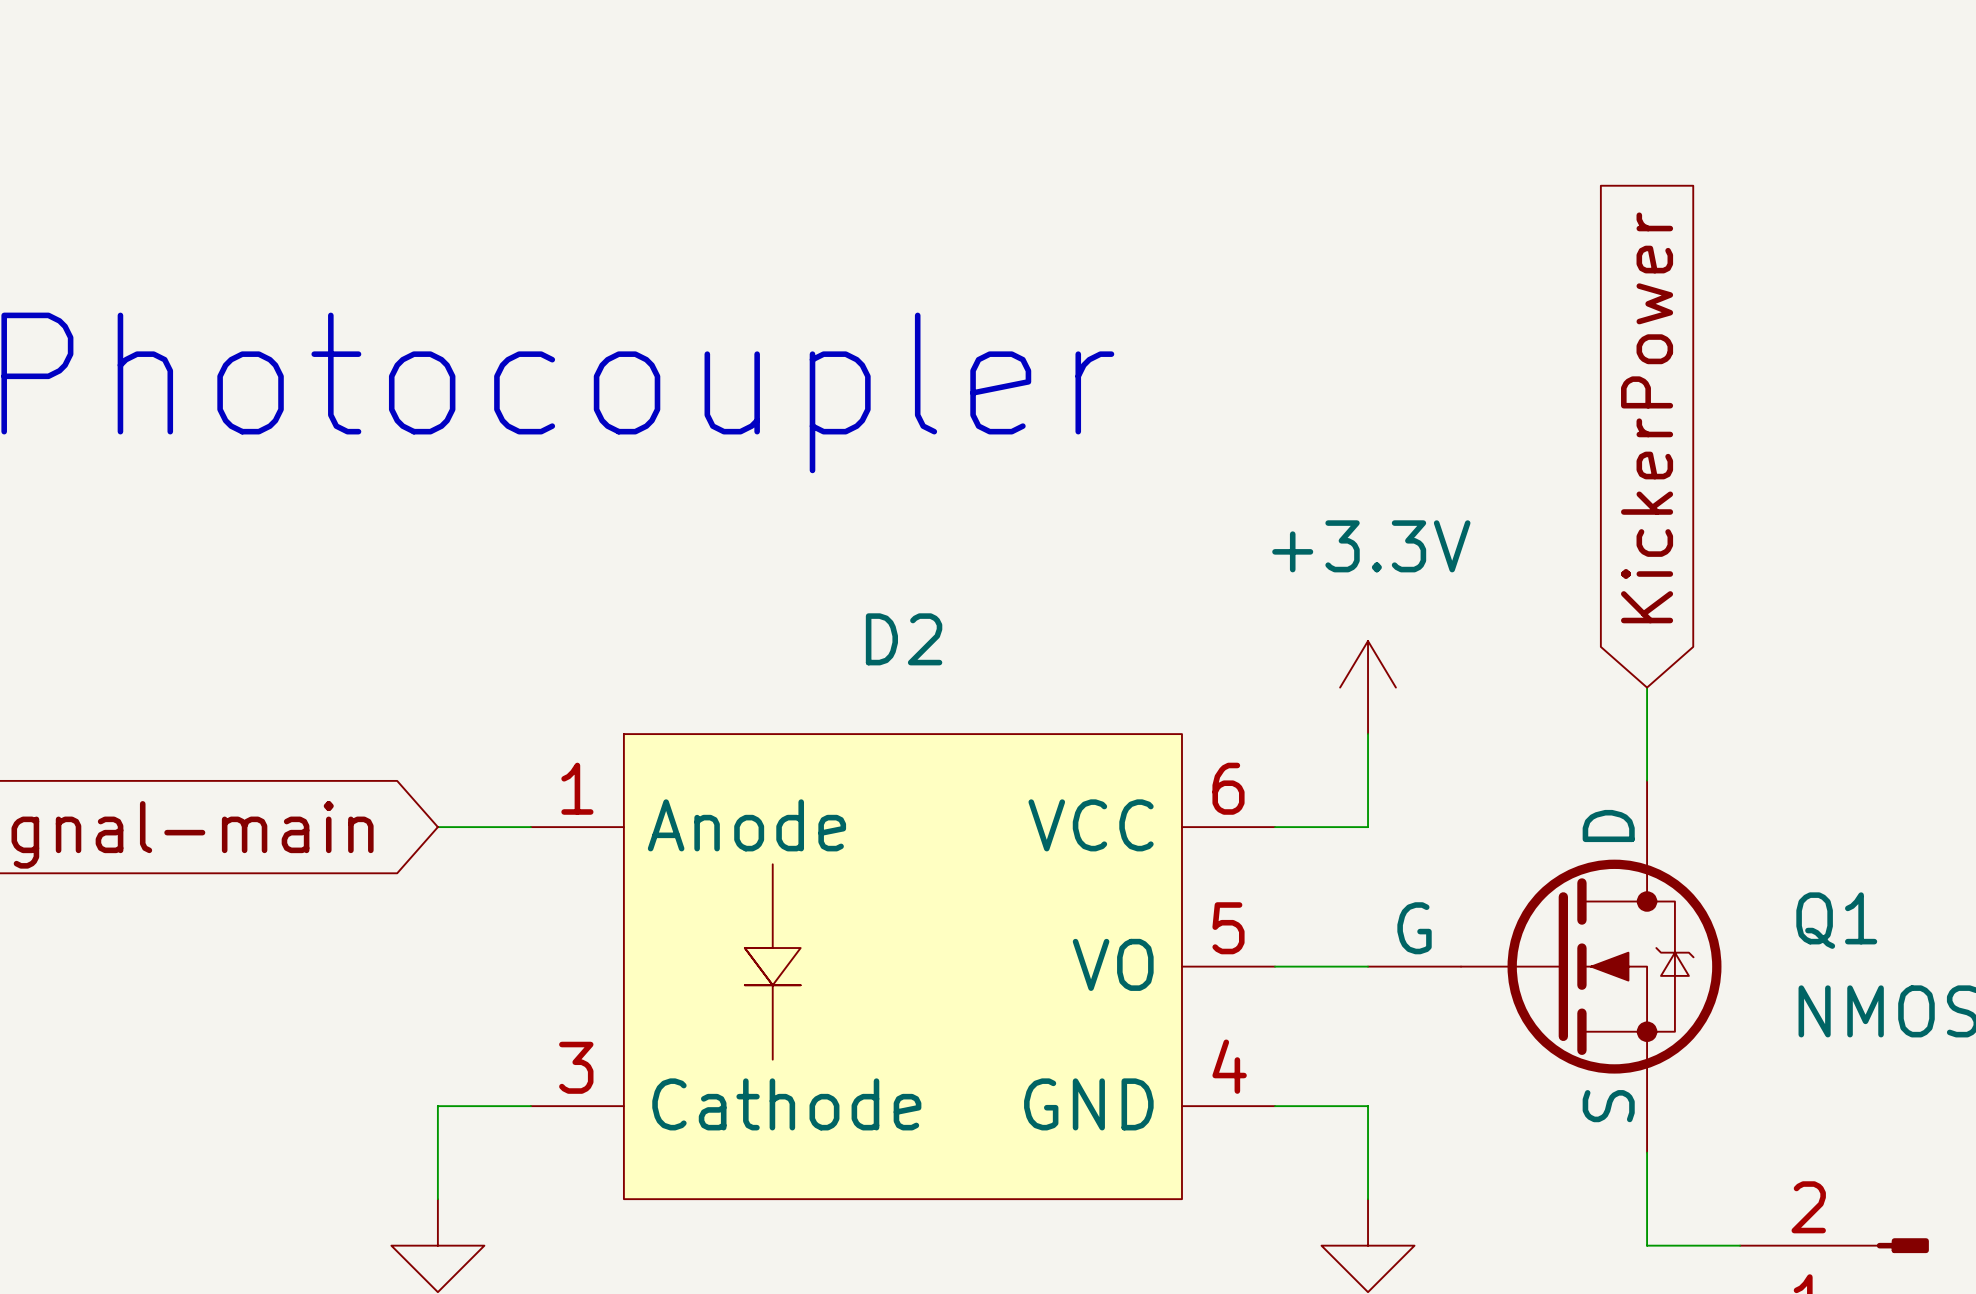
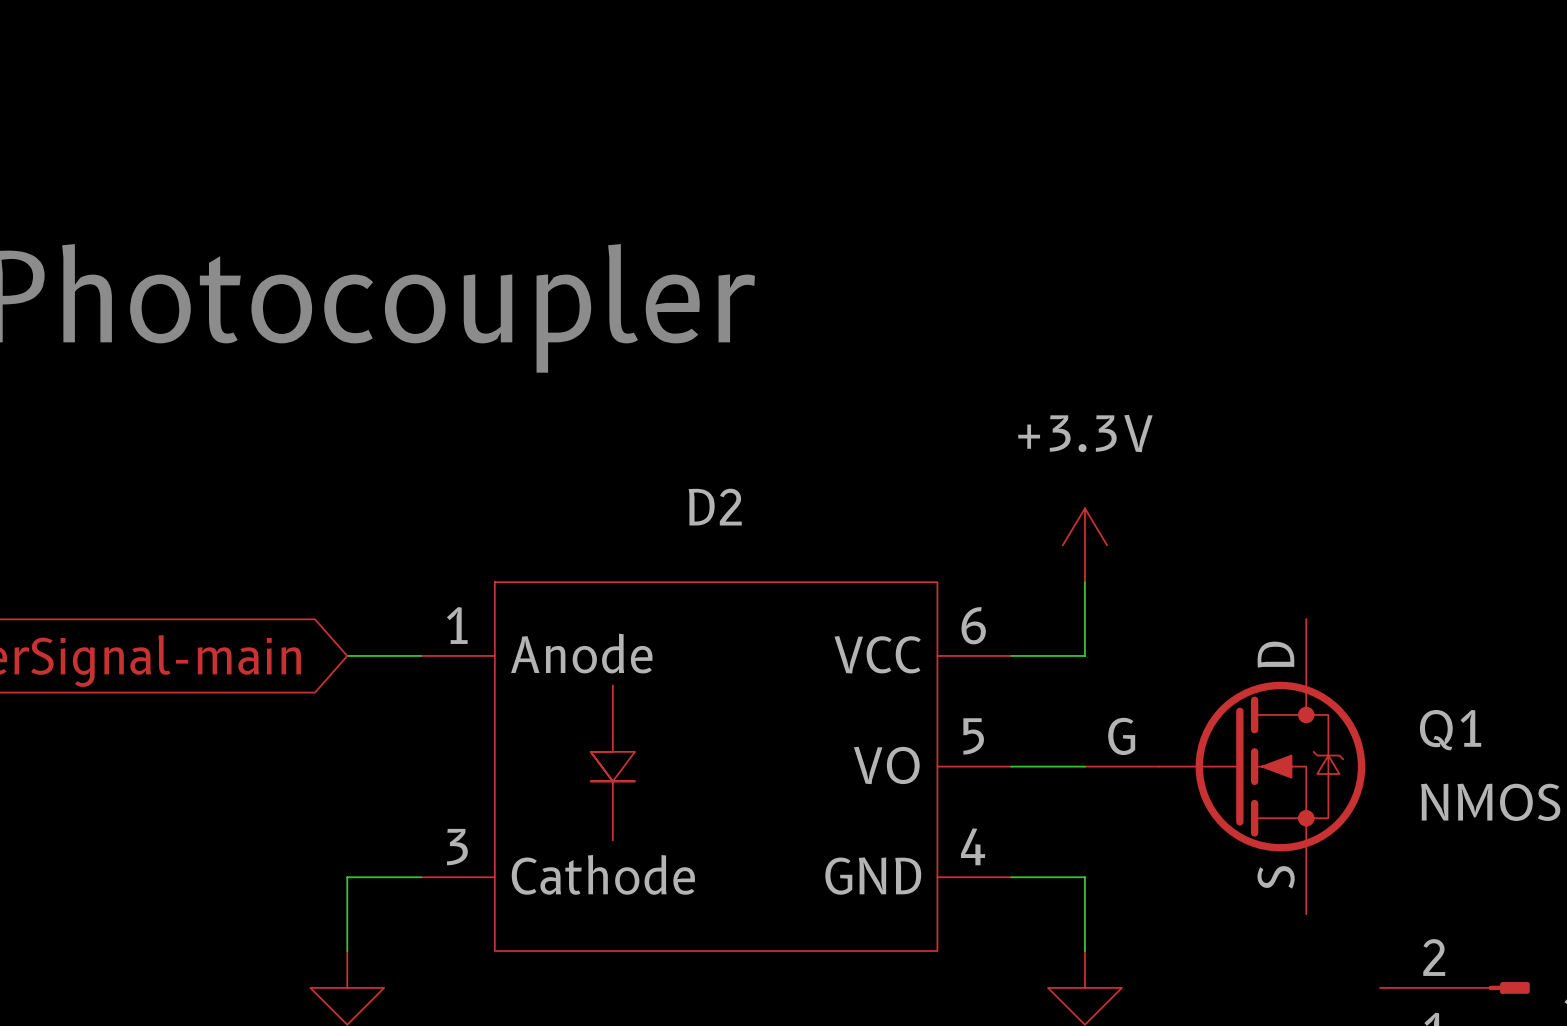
global label: KickerPower (1647, 417) -> none
wire: (1647, 687) (1647, 780) -> none
wire: (1647, 1152) (1647, 1245) (1740, 1245) -> none

